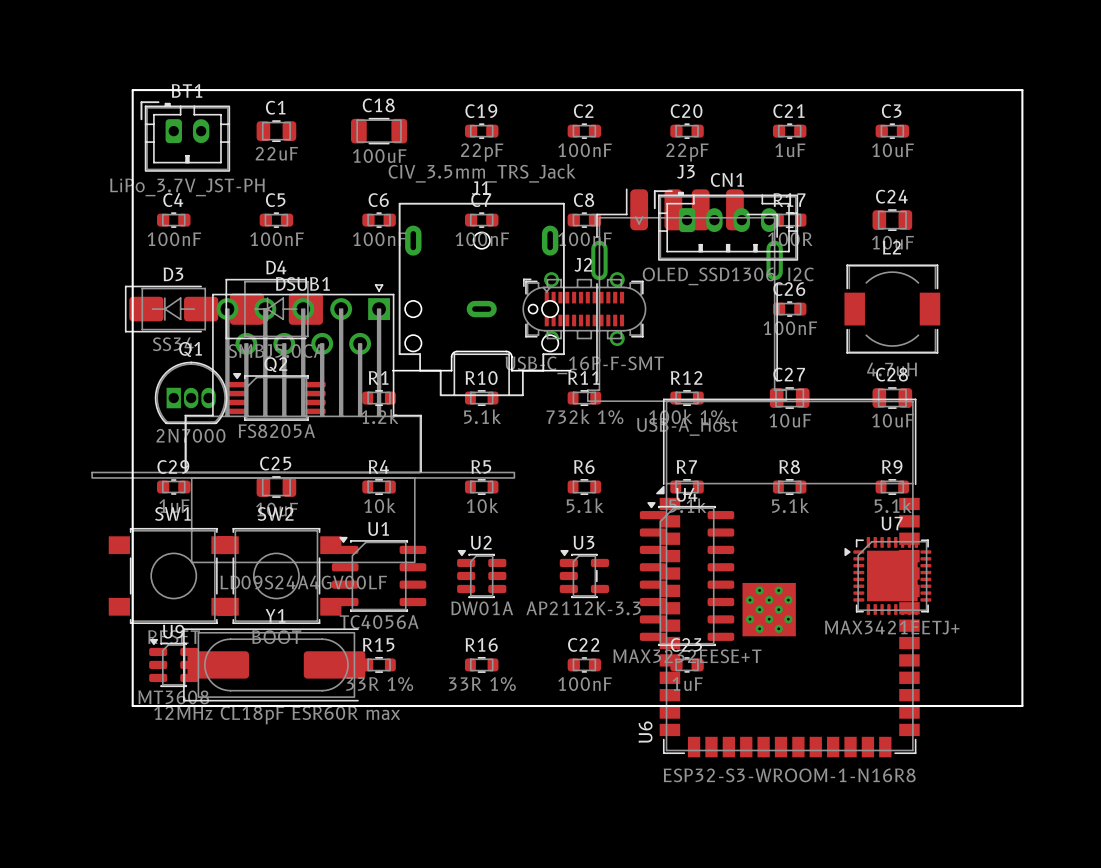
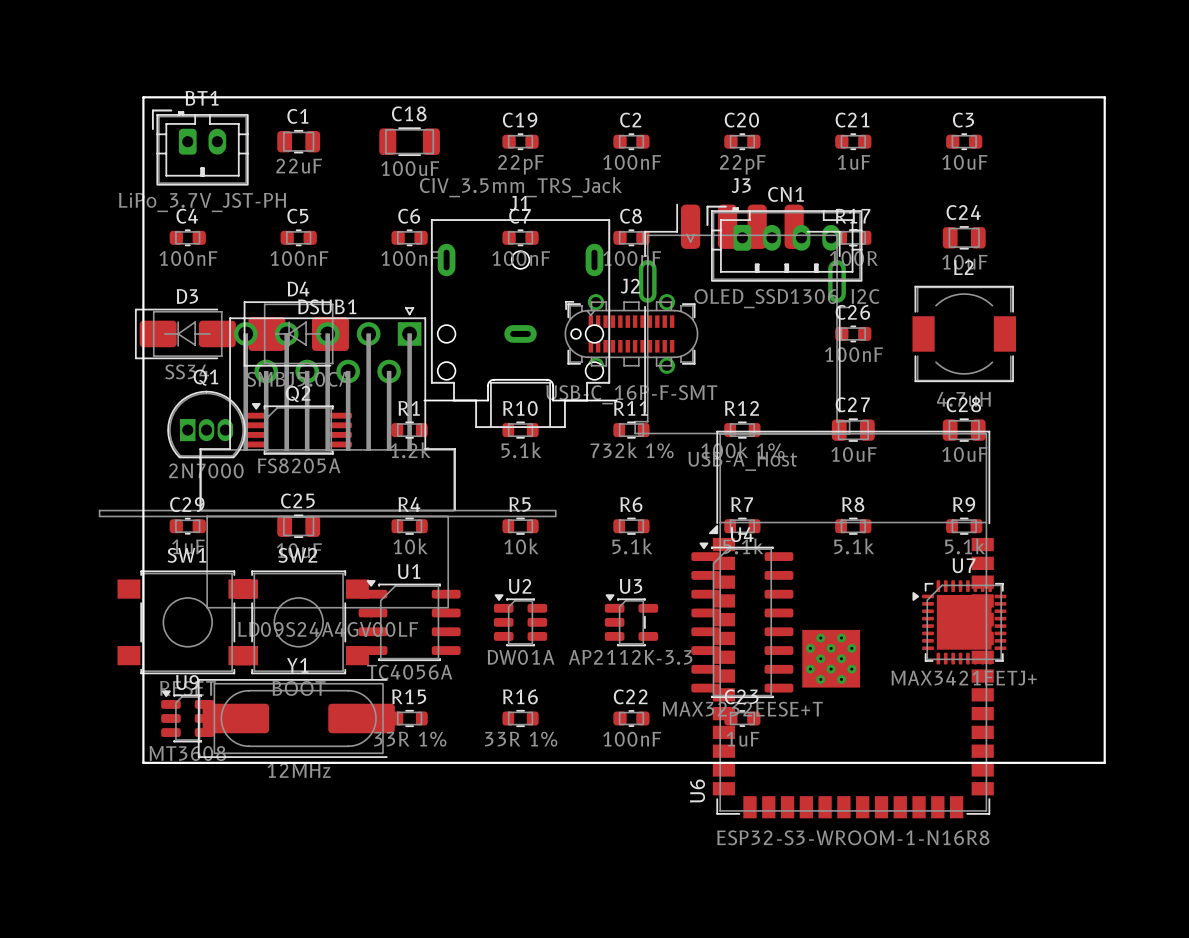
Y1 value: 12MHz CL18pF ESR60R max (277, 715) -> 12MHz (299, 770)

